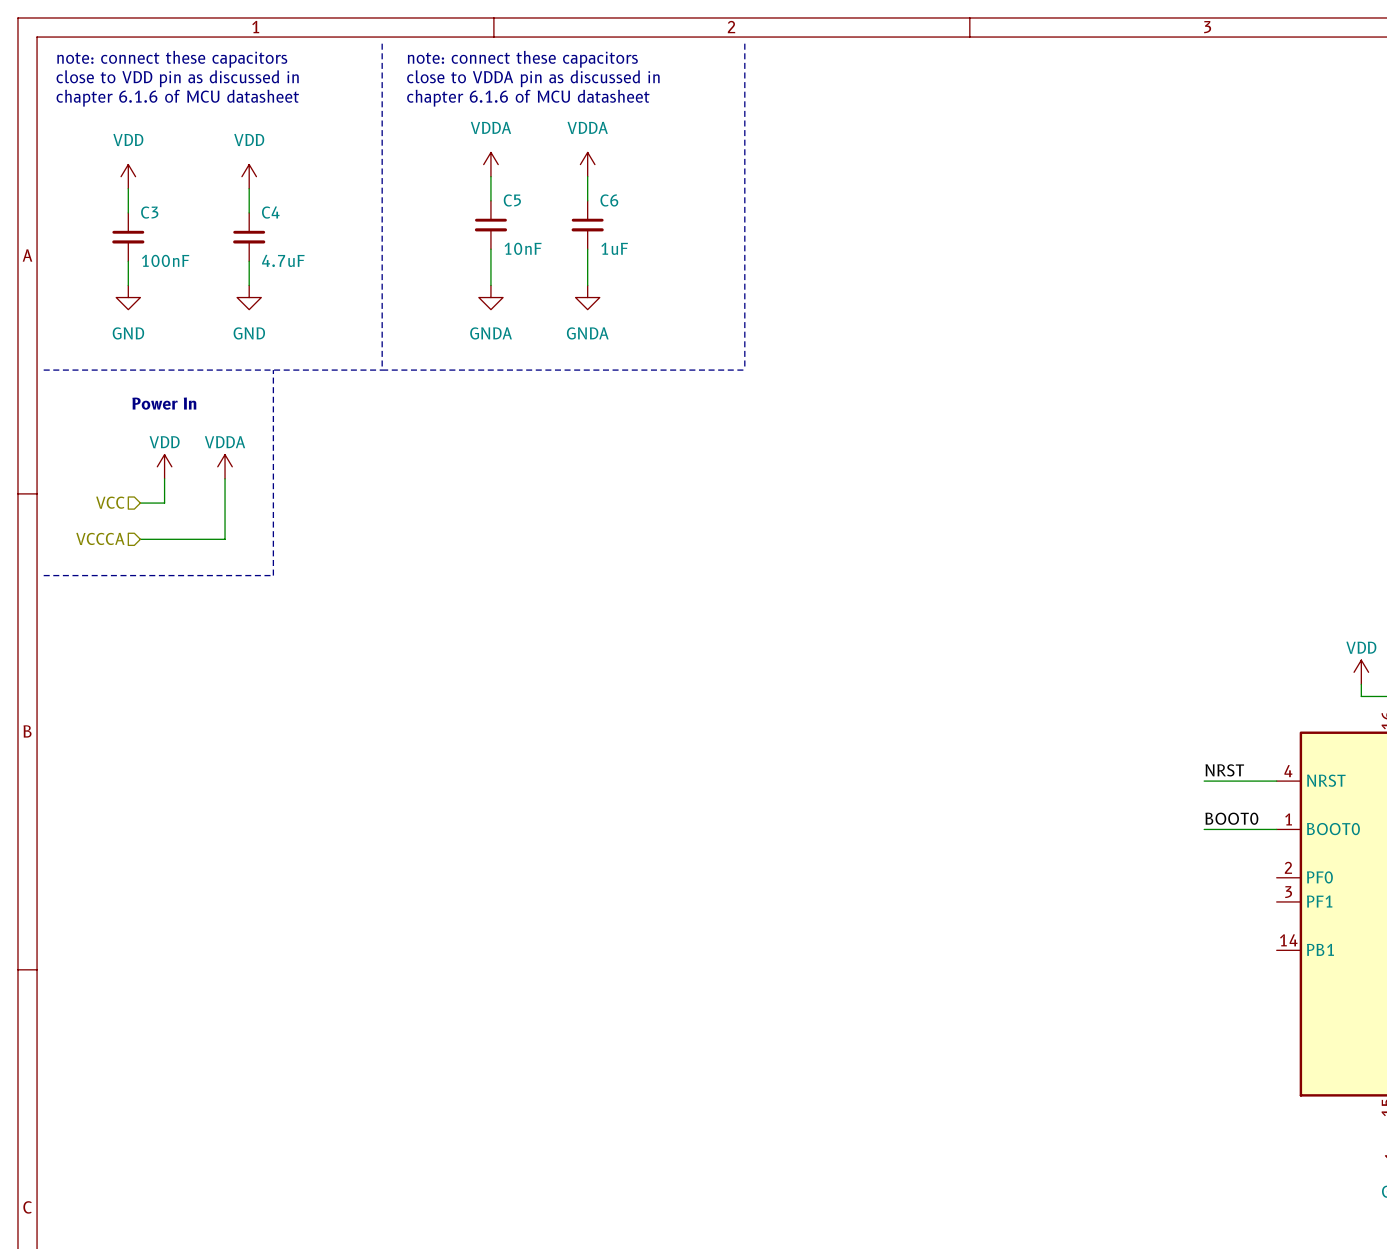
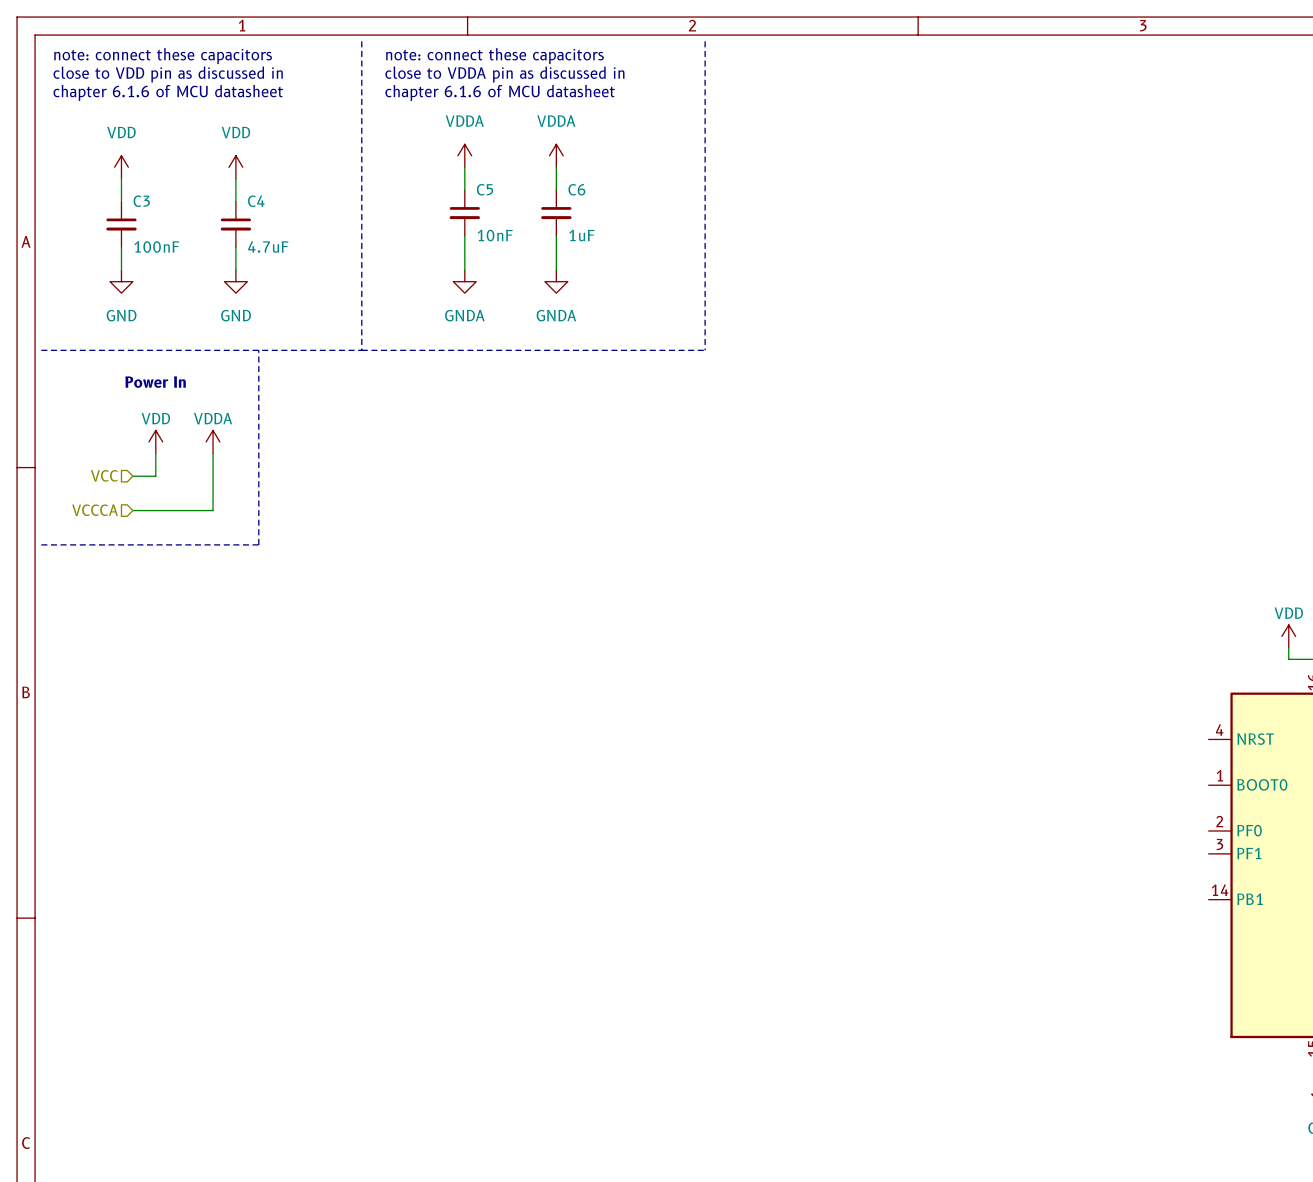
label: NRST (1224, 770) -> none
wire: (1204, 781) (1276, 781) -> none
label: BOOT0 (1231, 818) -> none
wire: (1204, 829) (1276, 829) -> none

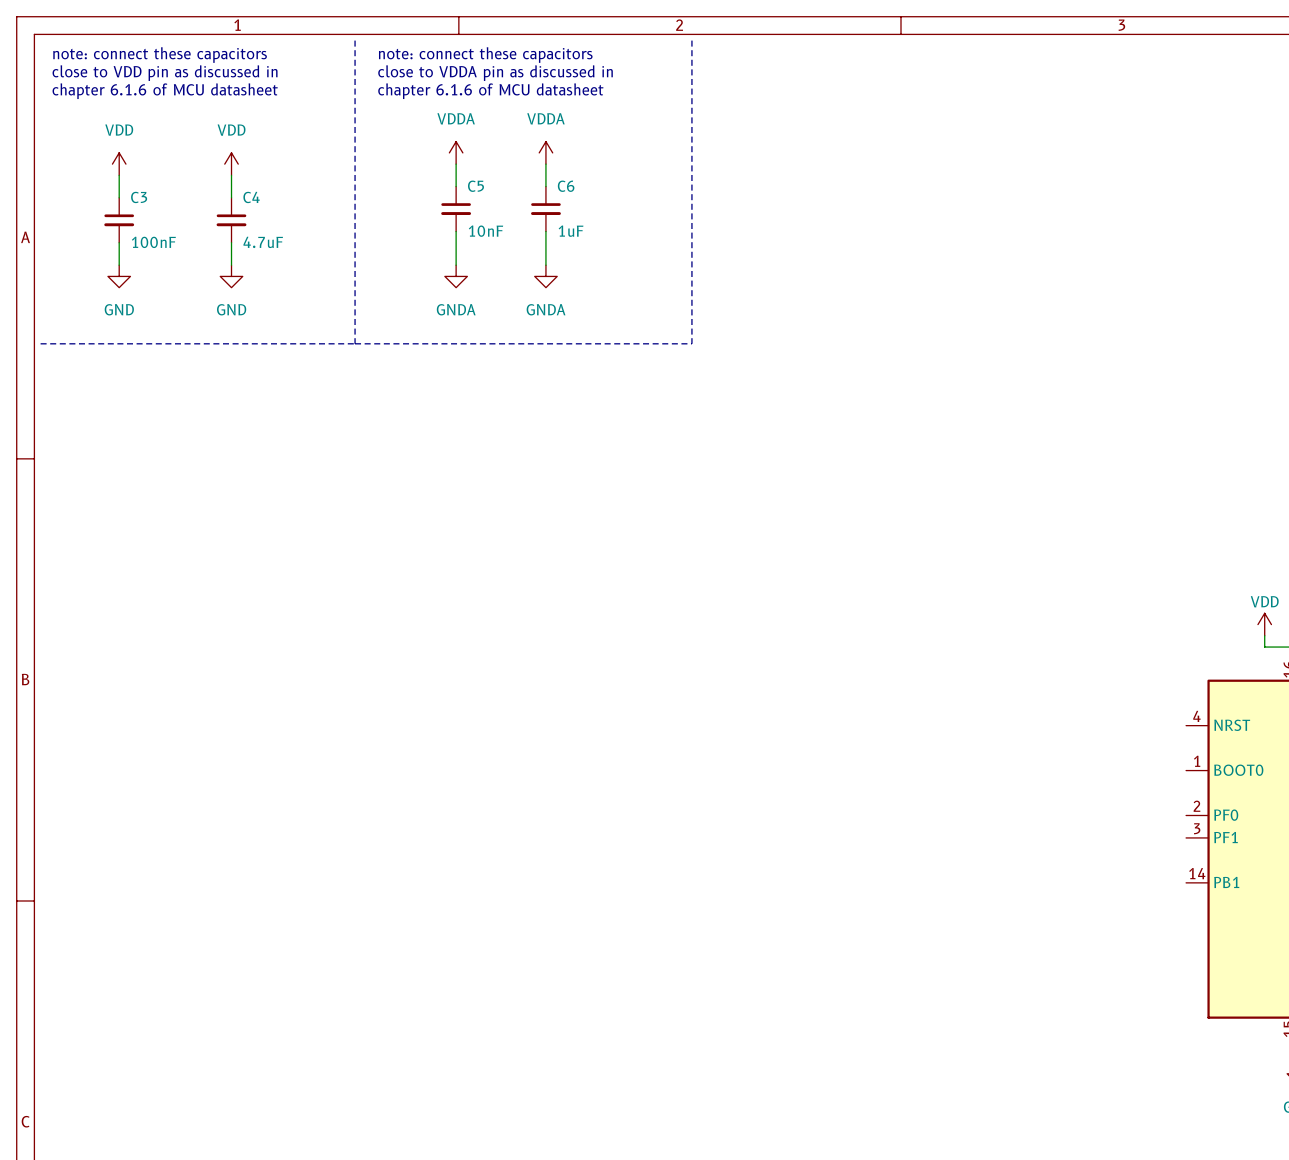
line: (258, 350) (258, 544) (41, 544) -> none
text: Power In (155, 382) -> none
power symbol: VDD (155, 441) -> none
power symbol: VDDA (213, 441) -> none
wire: (155, 453) (155, 476) (132, 476) -> none
wire: (213, 453) (213, 510) (132, 510) -> none
hierarchical label: VCC (104, 475) -> none
hierarchical label: VCCCA (95, 510) -> none

